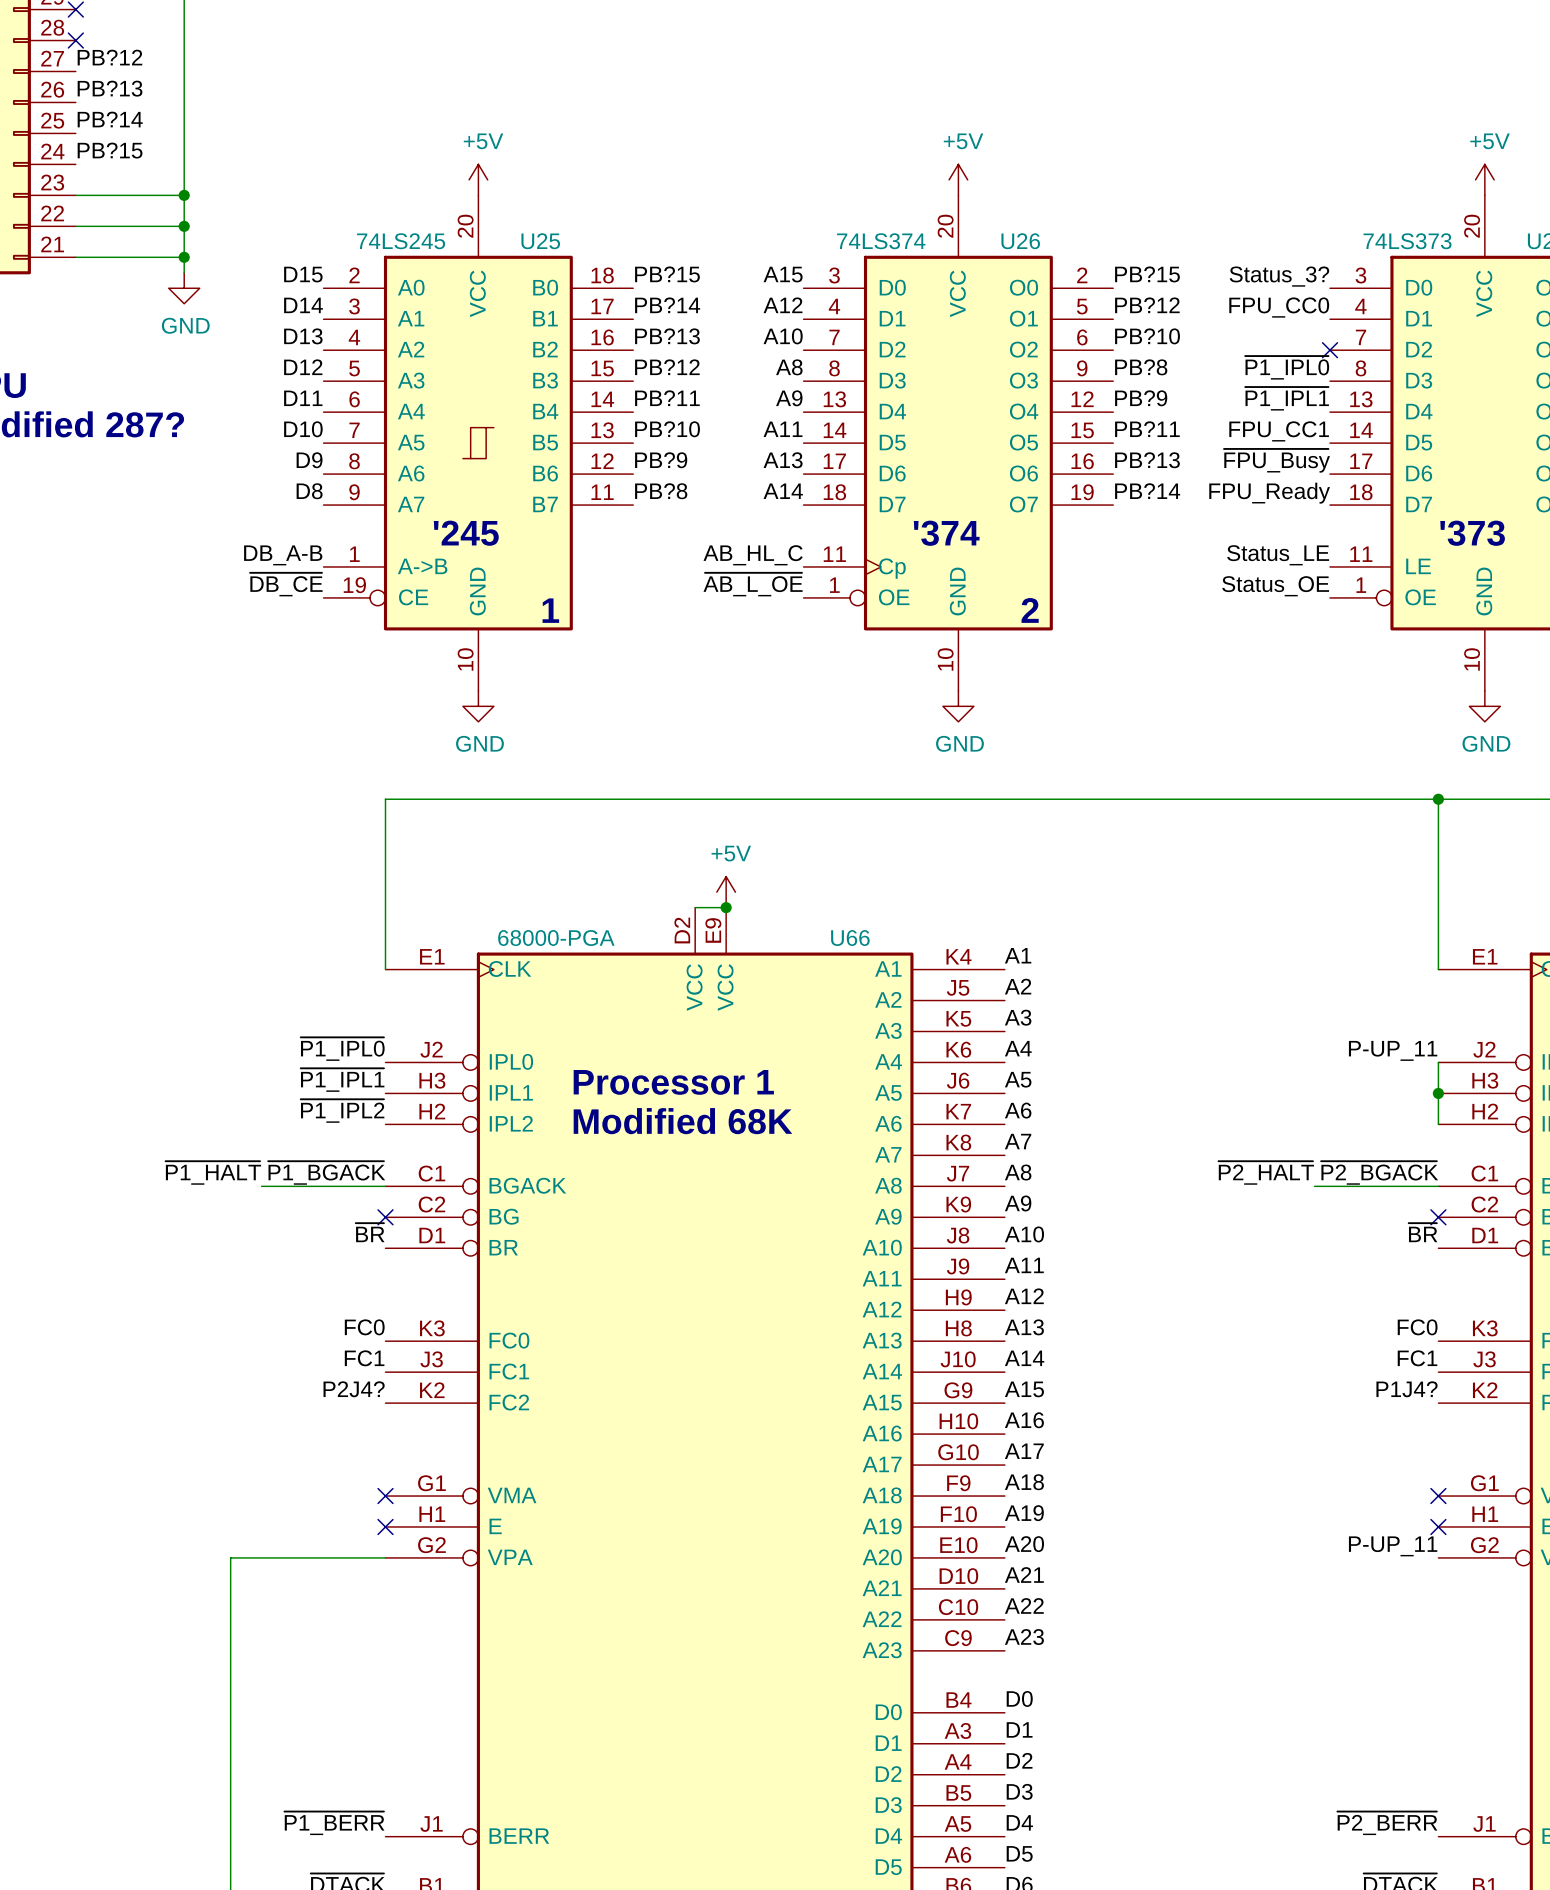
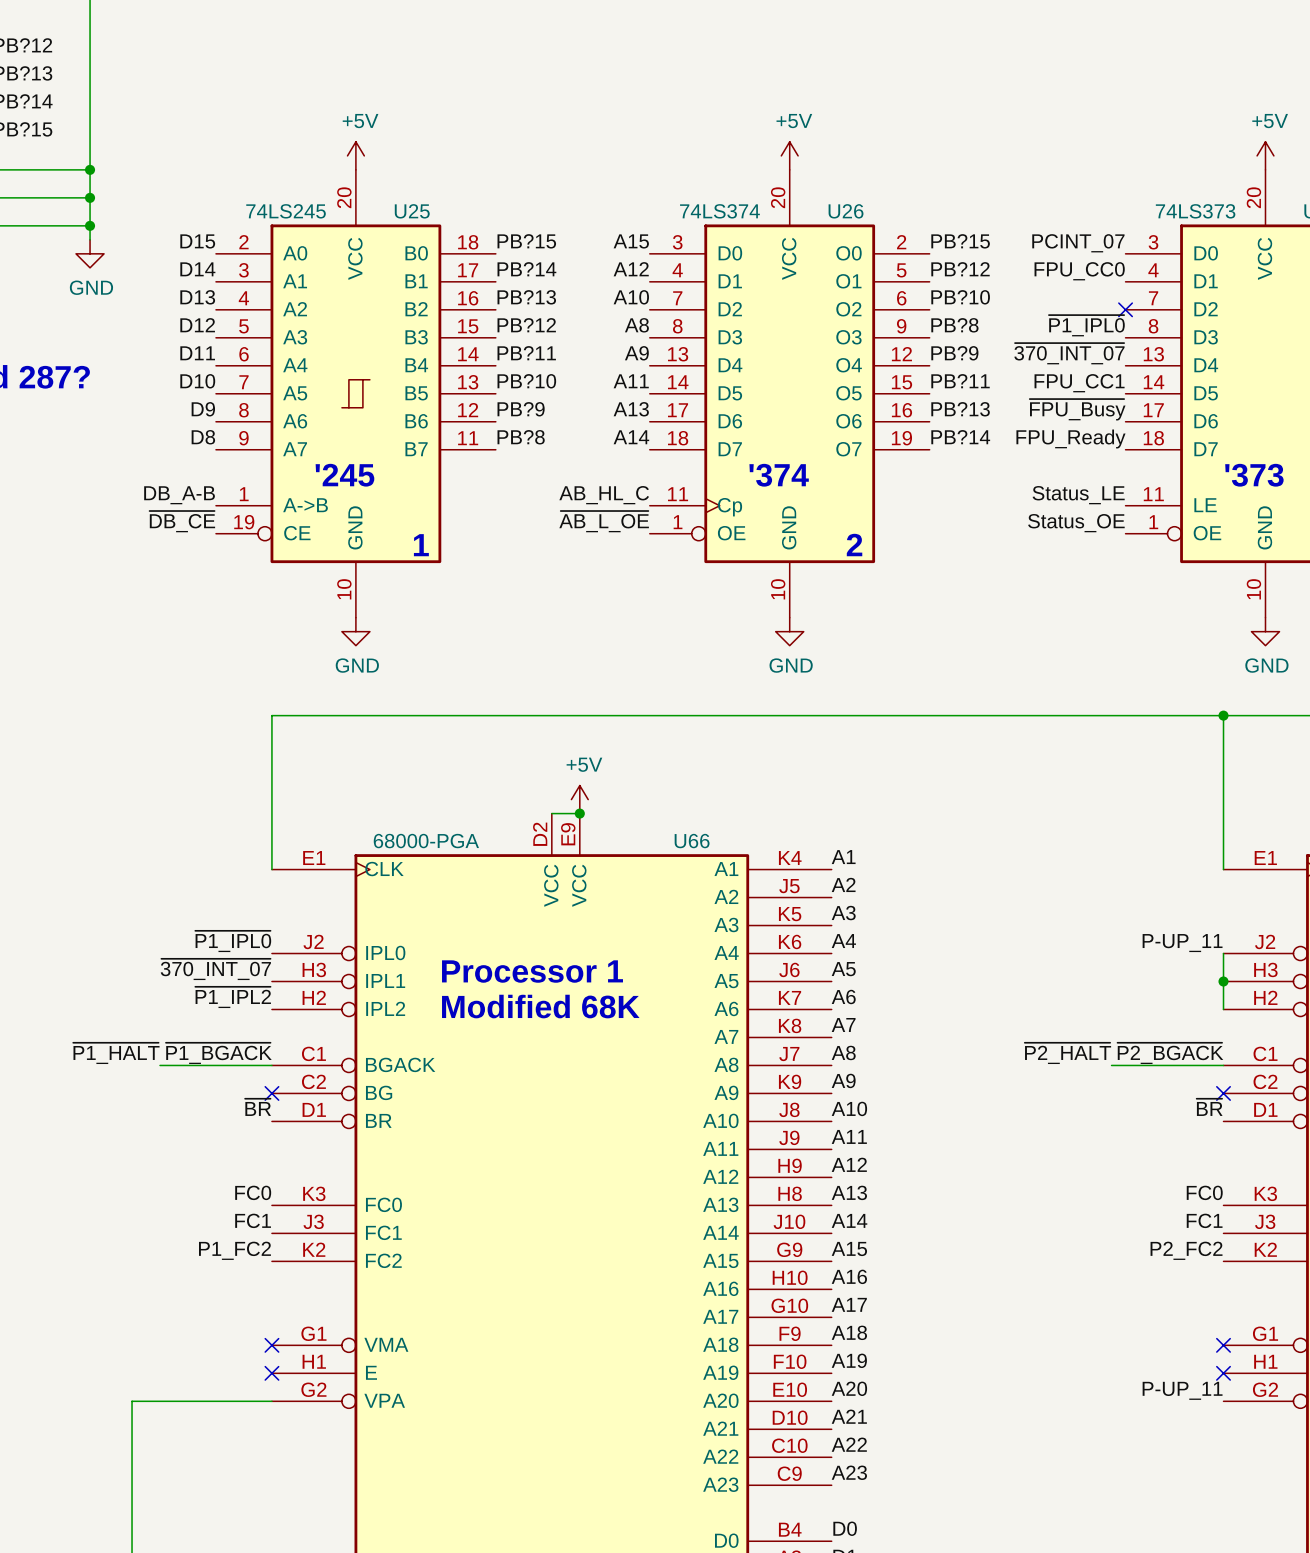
label: Status_3? (1279, 276) -> PCINT_07 (1078, 243)
label: ~{P1_IPL1} (1287, 398) -> ~{370_INT_07} (1069, 353)
label: ~{P1_IPL1} (342, 1080) -> ~{370_INT_07} (215, 969)
label: P2J4? (354, 1389) -> P1_FC2 (234, 1250)
label: P1J4? (1407, 1389) -> P2_FC2 (1186, 1250)

